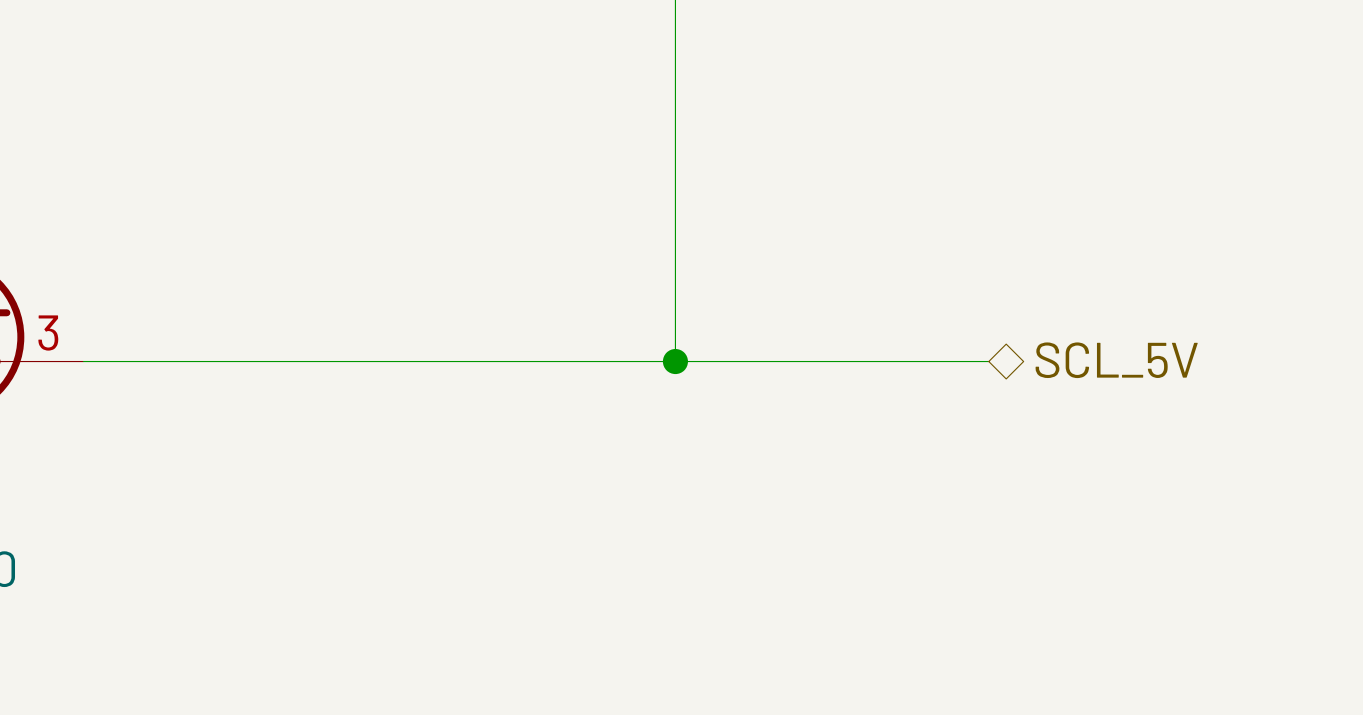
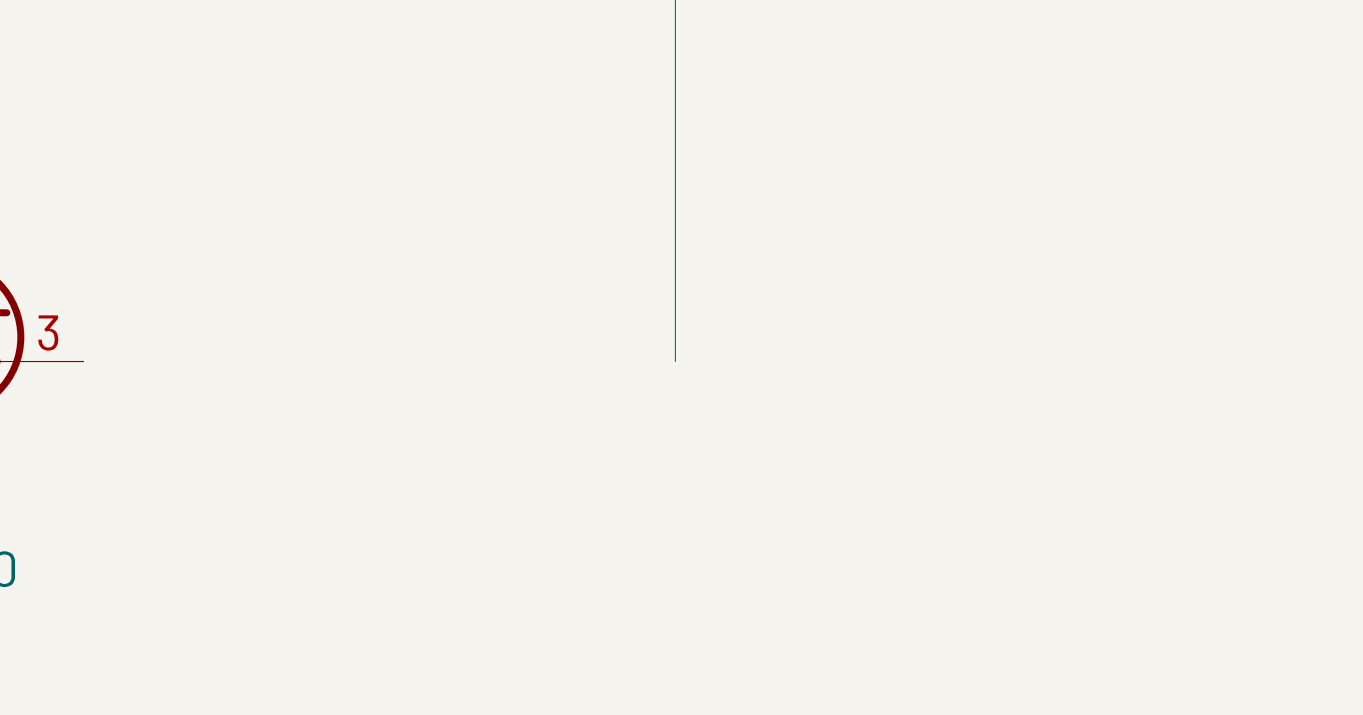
hierarchical label: SCL_5V (1116, 360) -> none
wire: (83, 361) (988, 361) -> none
junction: (675, 361) -> none

